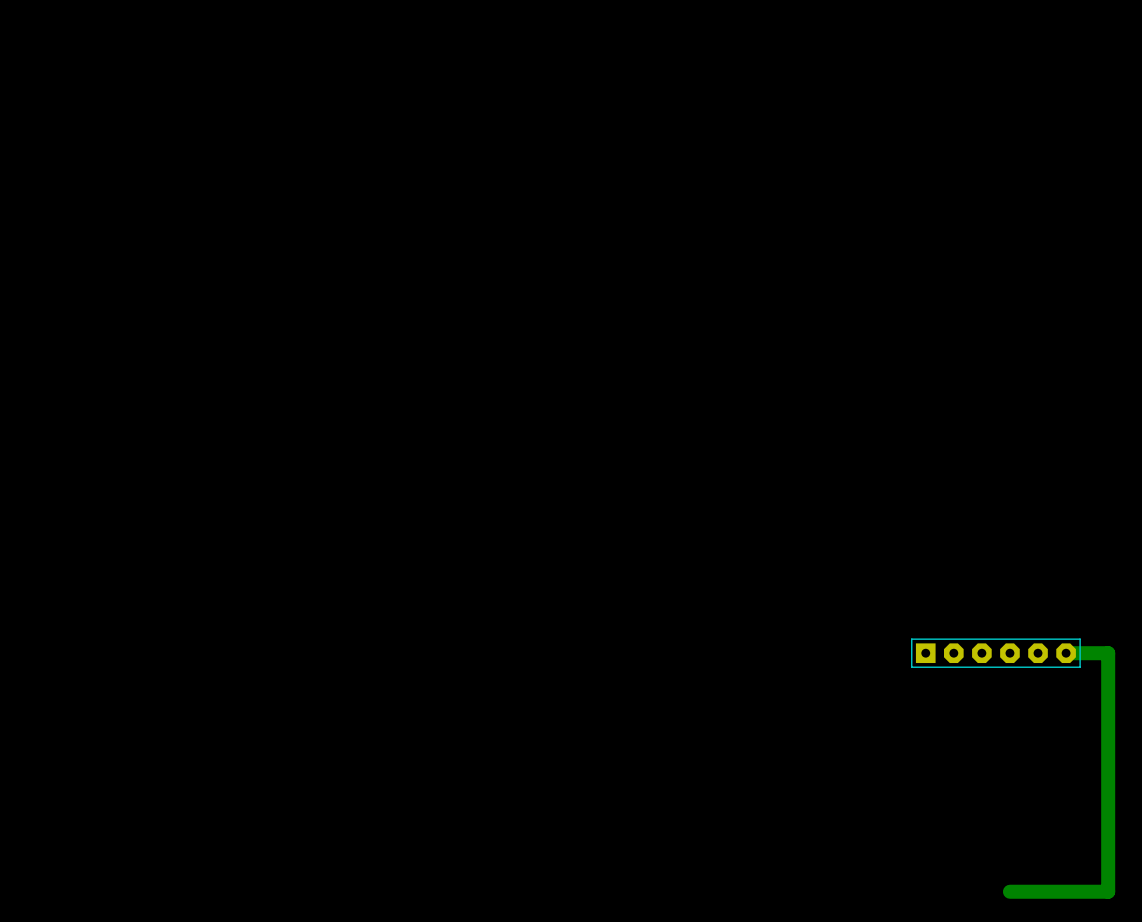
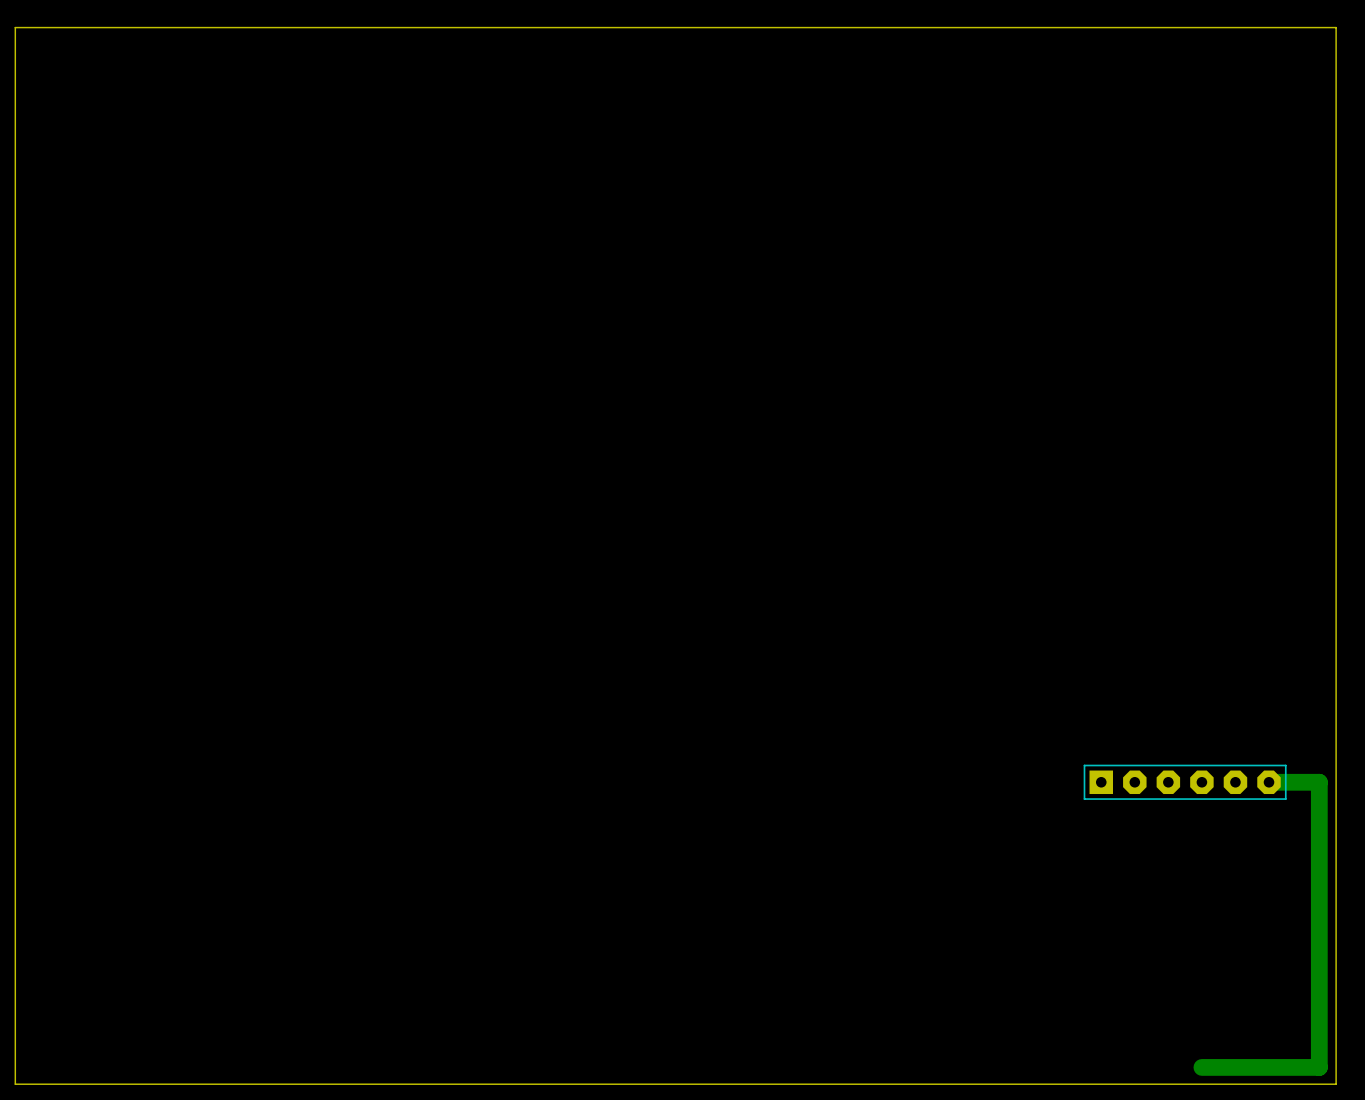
board edge: none -> (1336, 27) (15, 27) (15, 1084) (1336, 1084) (1336, 27)

